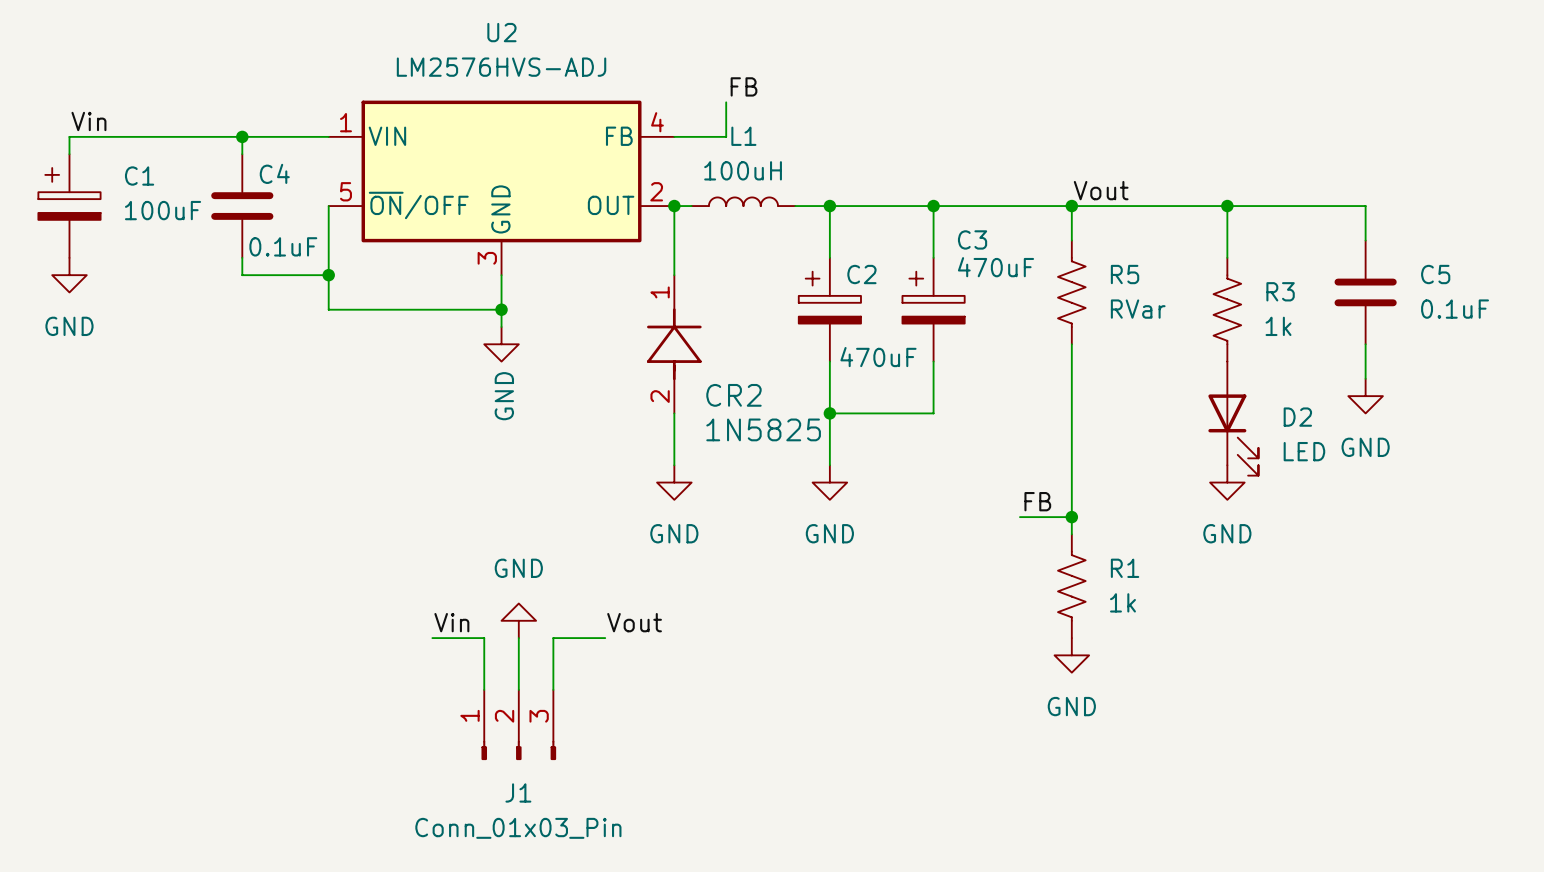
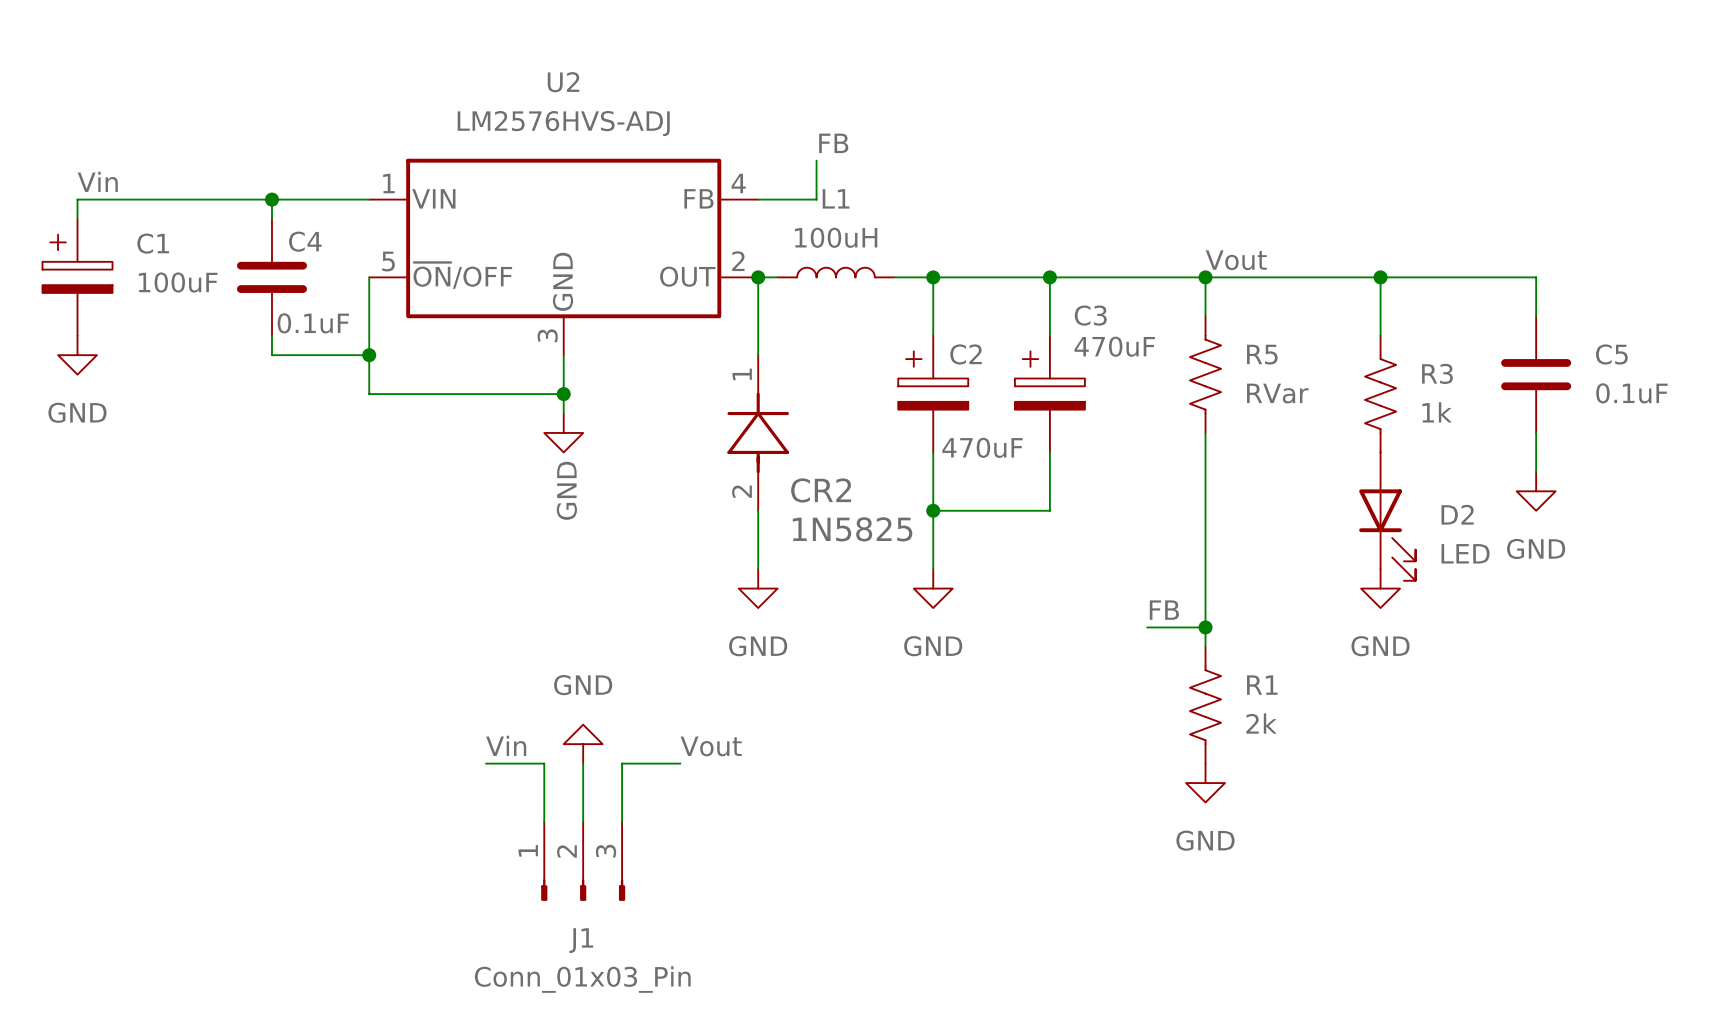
R1 value: 1k (1122, 602) -> 2k (1261, 723)

